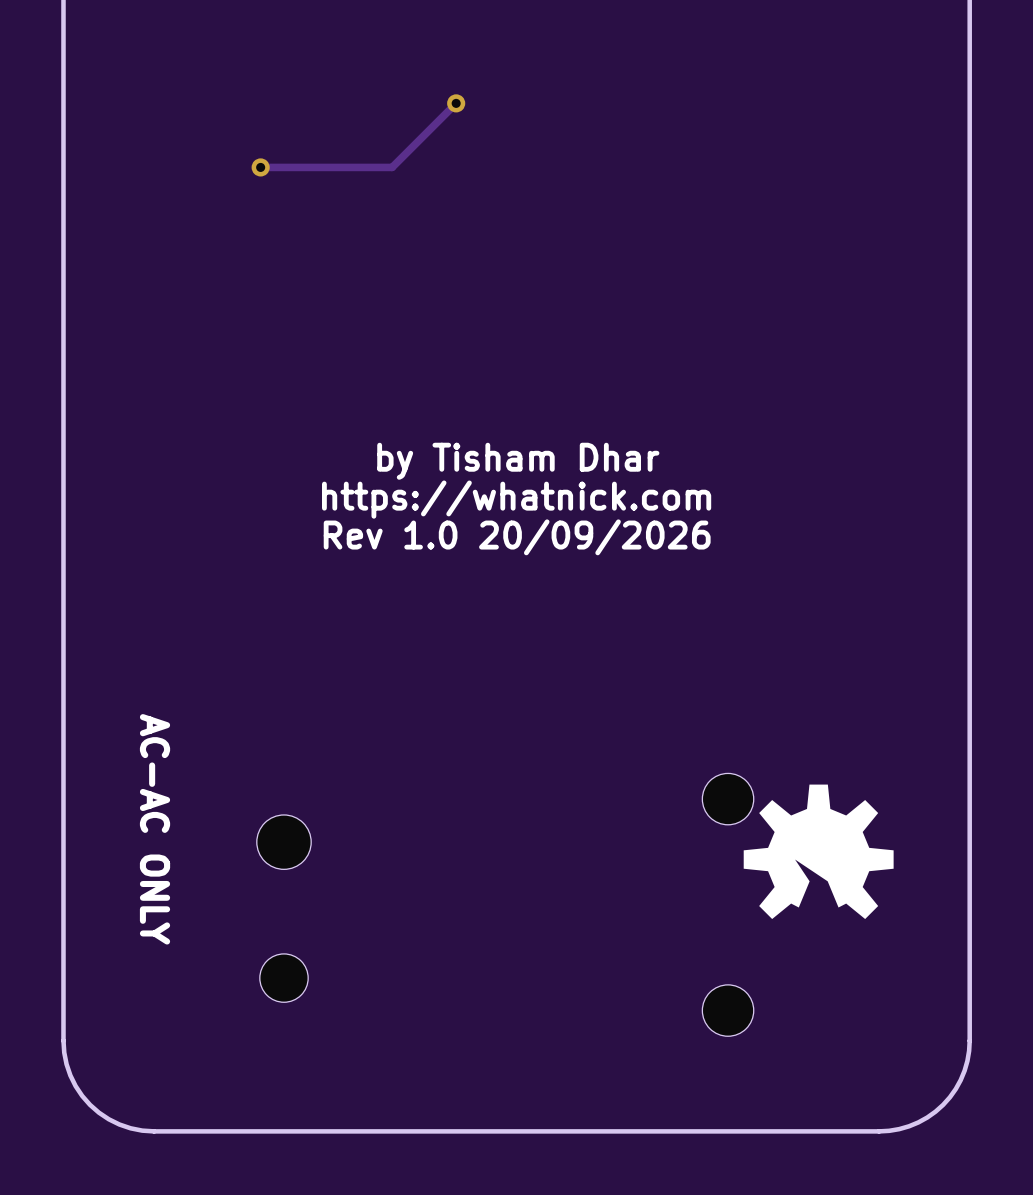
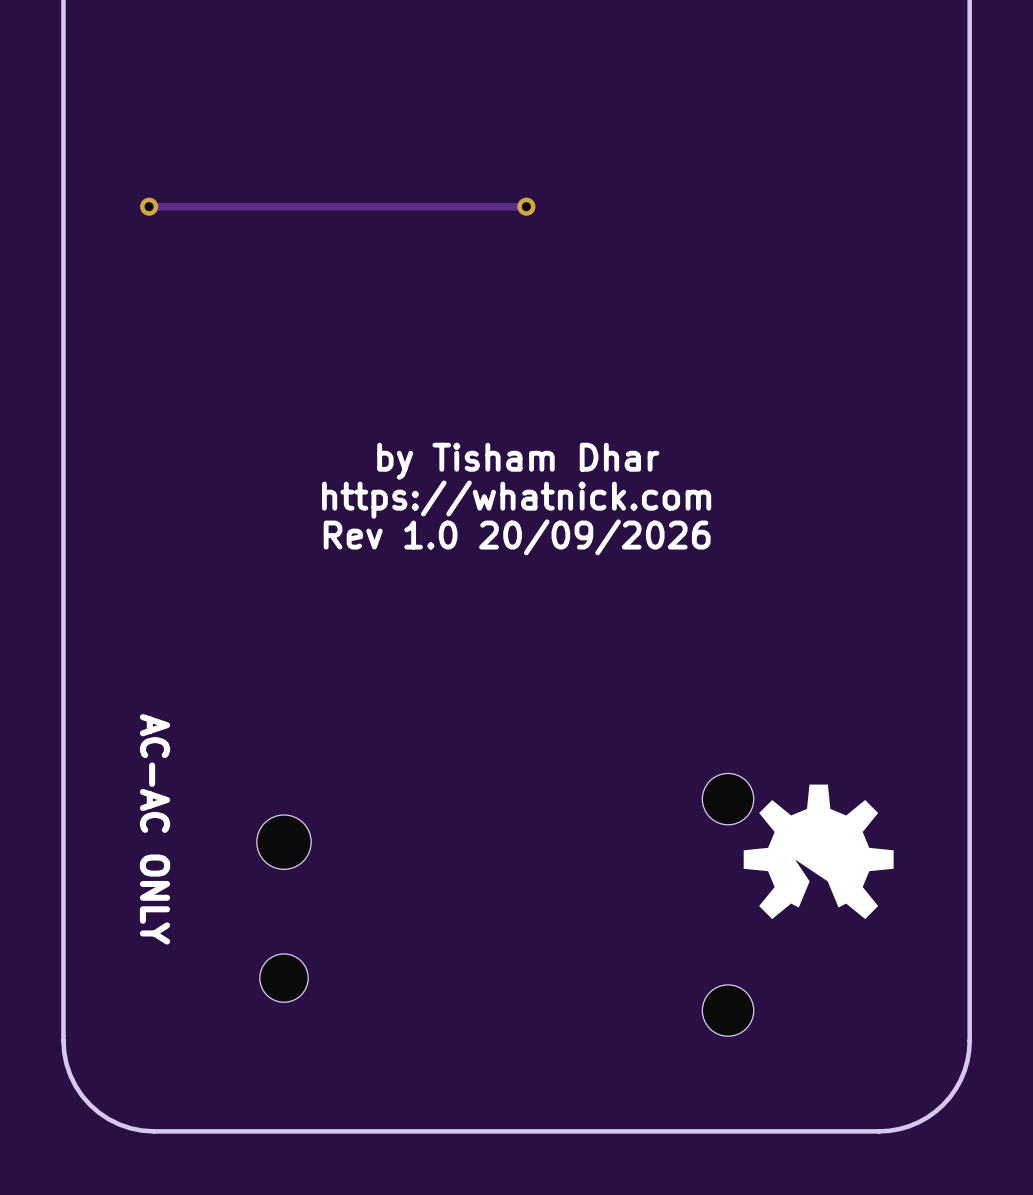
track: (456, 103) (392, 167) (260, 167) -> none
via position: (456, 103) -> (526, 206)
via position: (260, 167) -> (149, 206)
track: none -> (526, 206) (149, 206)

